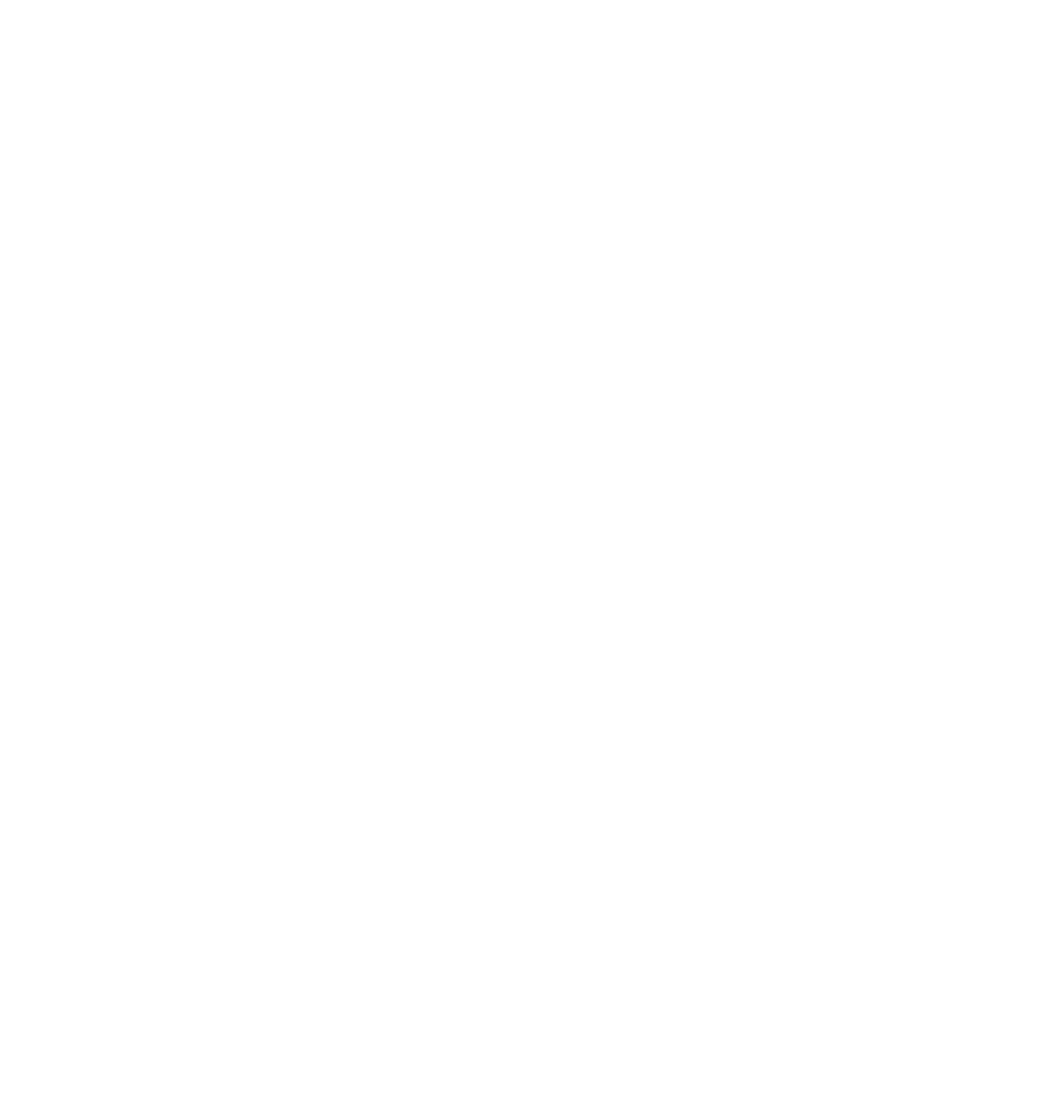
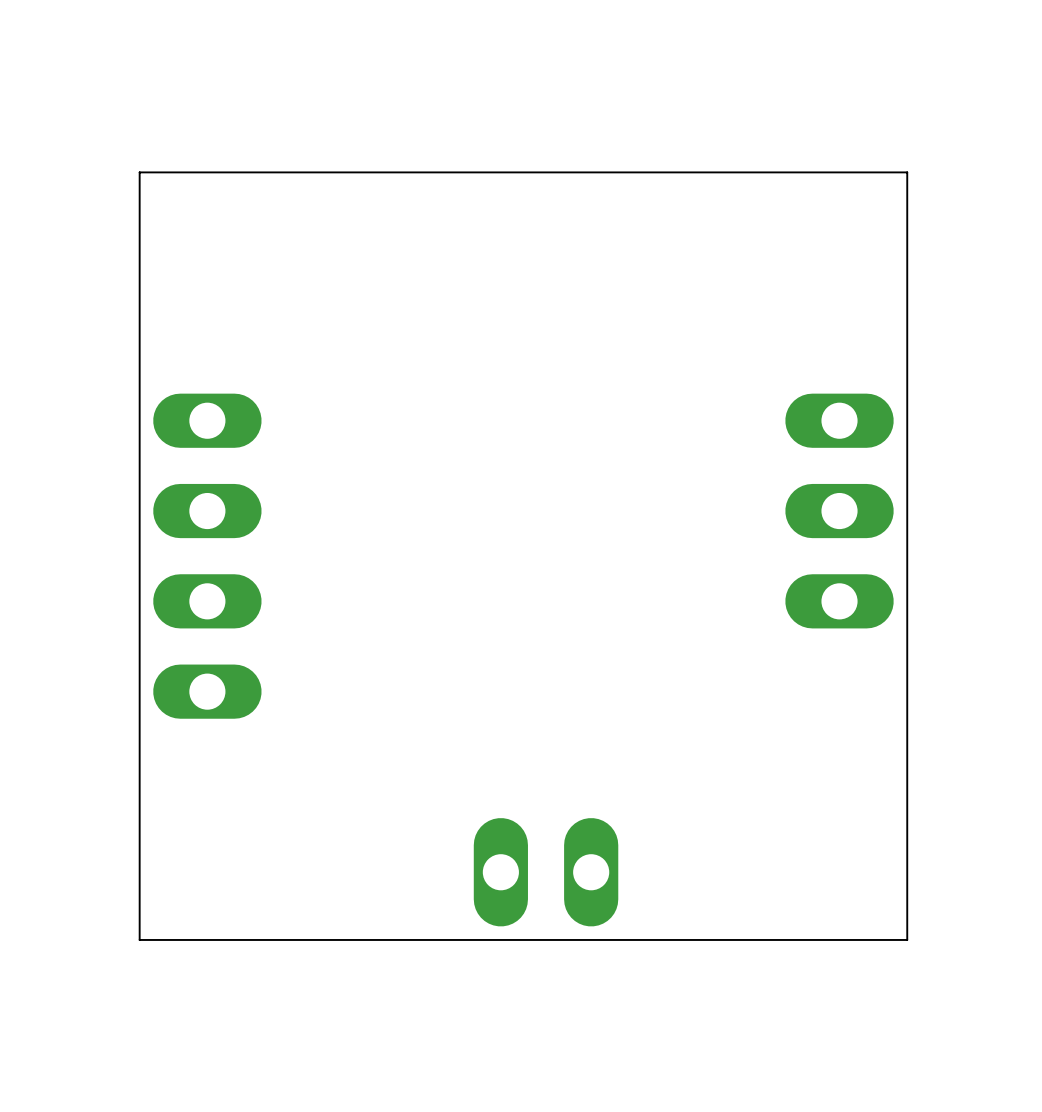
board edge: none -> (907, 172) (907, 939) (139, 939) (139, 172) (907, 172)
part: none -> (839, 511)
part: none -> (207, 556)
part: none -> (546, 872)

